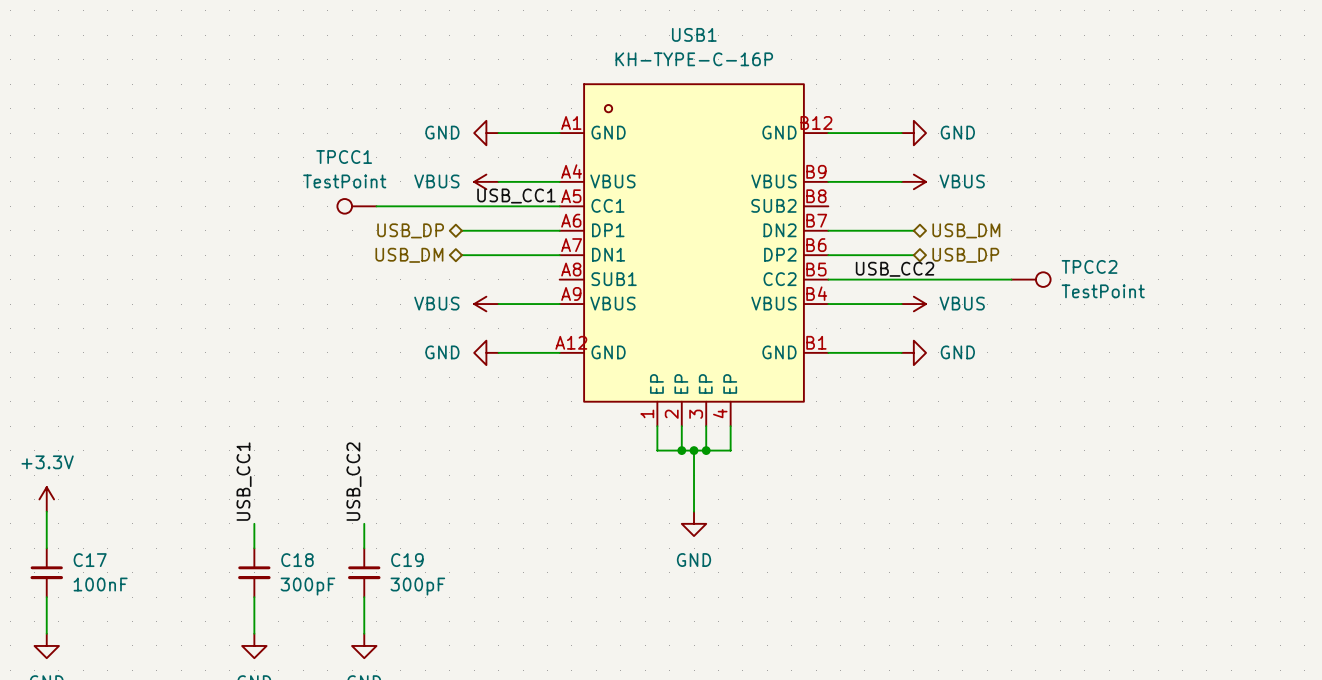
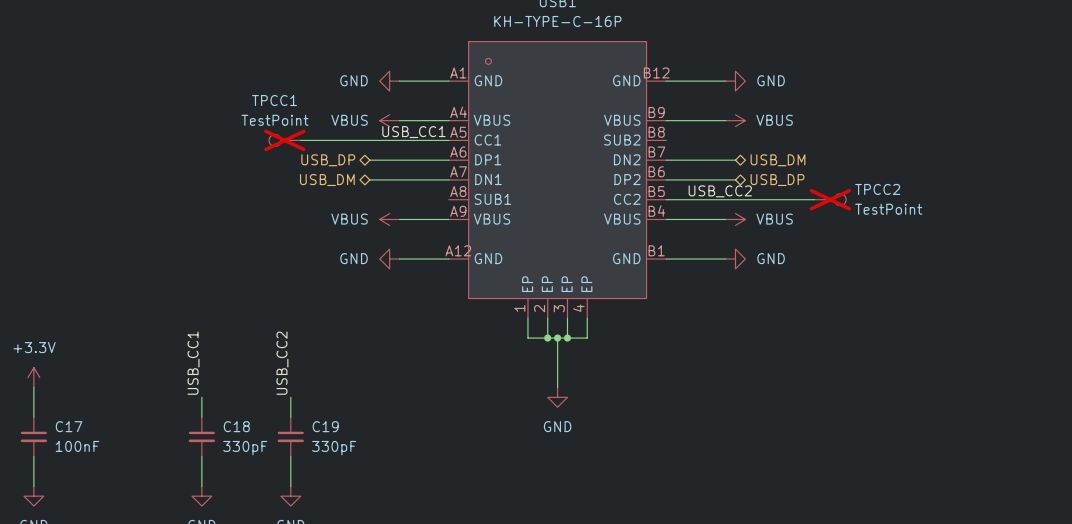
TPCC1 do-not-place cross: none -> (284, 140)
TPCC2 do-not-place cross: none -> (830, 199)
C18 value: 300pF (307, 586) -> 330pF (245, 448)
C19 value: 300pF (417, 586) -> 330pF (334, 448)

